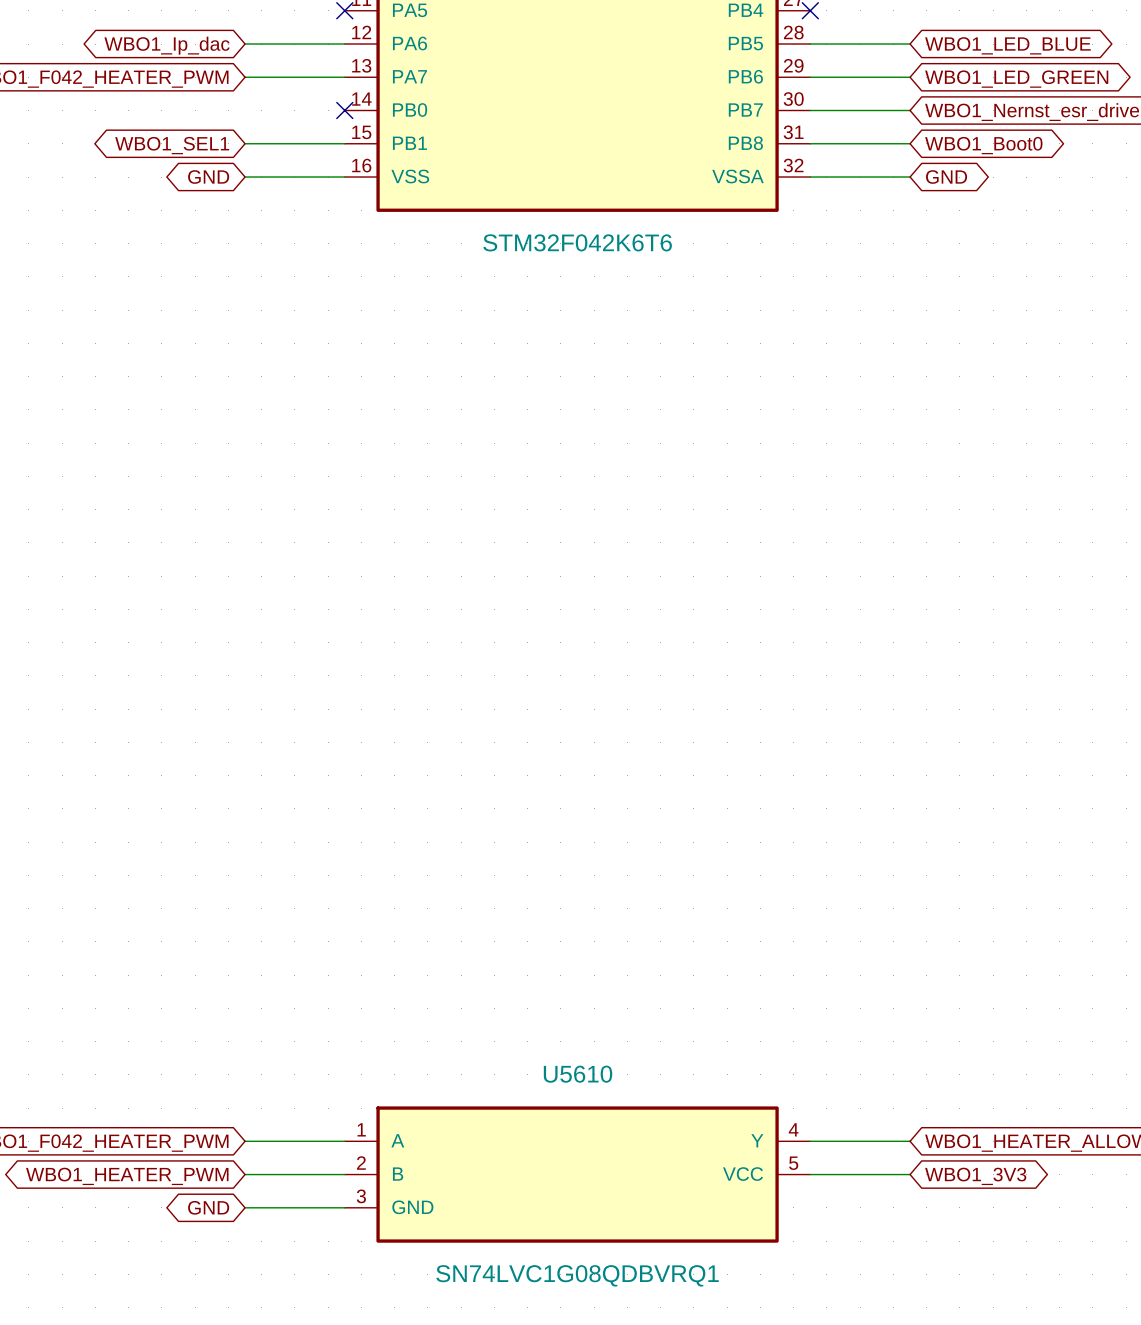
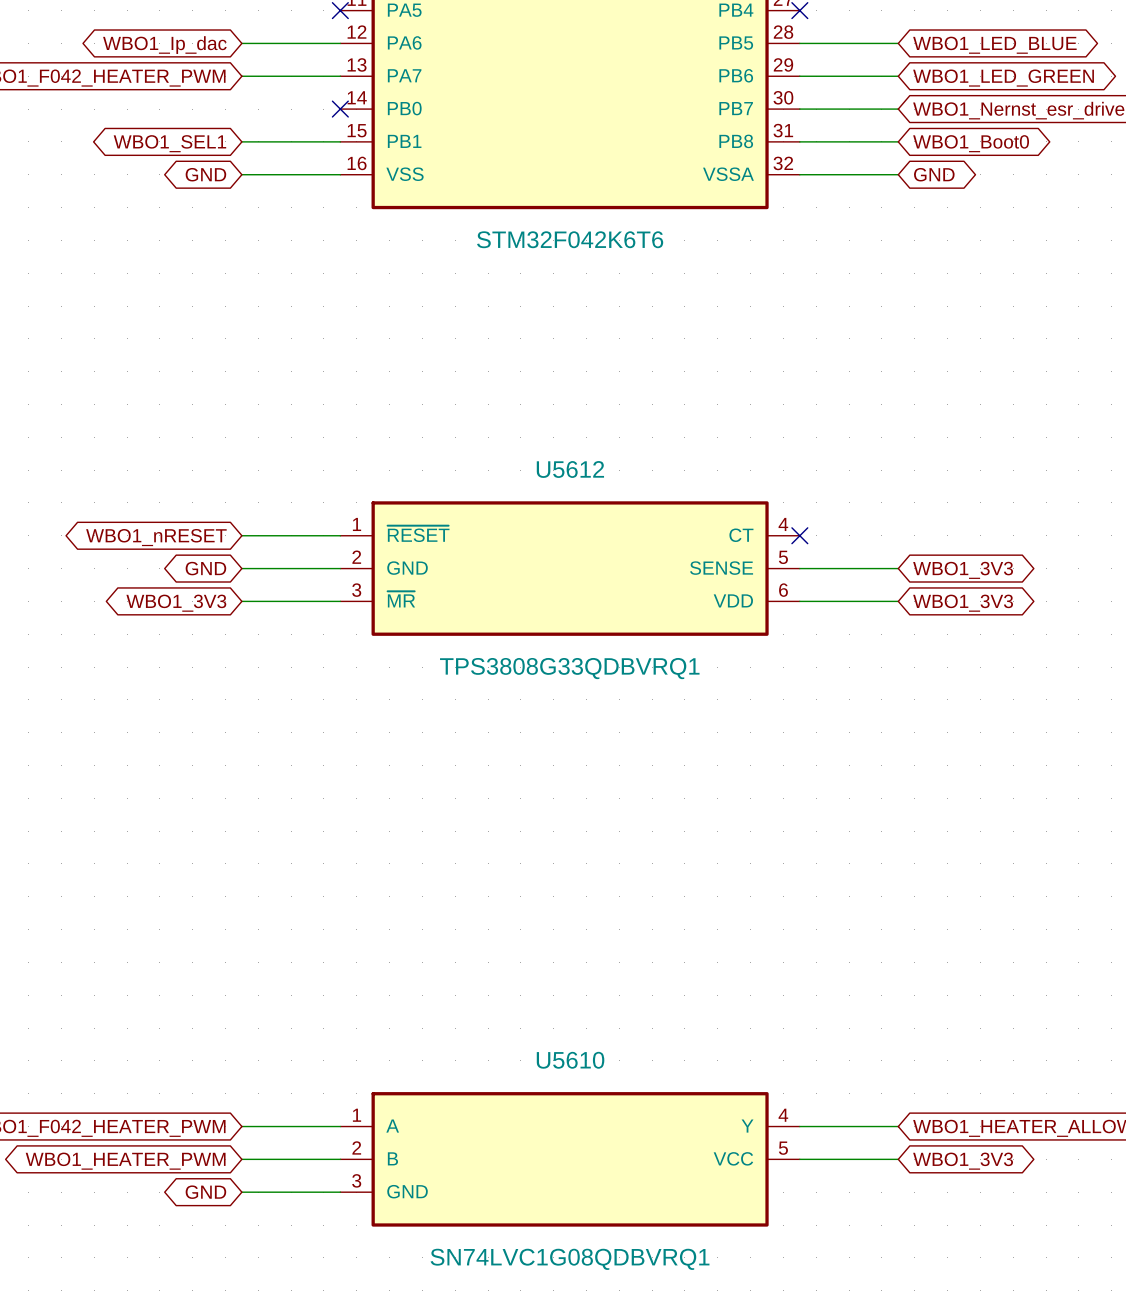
wire: none -> (241, 535) (340, 535)
no-connect mark: none -> (799, 535)
global label: none -> WBO1_nRESET (156, 537)
global label: none -> GND (205, 568)
wire: none -> (241, 568) (340, 568)
U5612: none -> TPS3808G33QDBVRQ1 (570, 568)
wire: none -> (799, 568) (898, 568)
global label: none -> WBO1_3V3 (963, 570)
wire: none -> (241, 601) (340, 601)
wire: none -> (799, 601) (898, 601)
global label: none -> WBO1_3V3 (176, 603)
global label: none -> WBO1_3V3 (963, 603)

